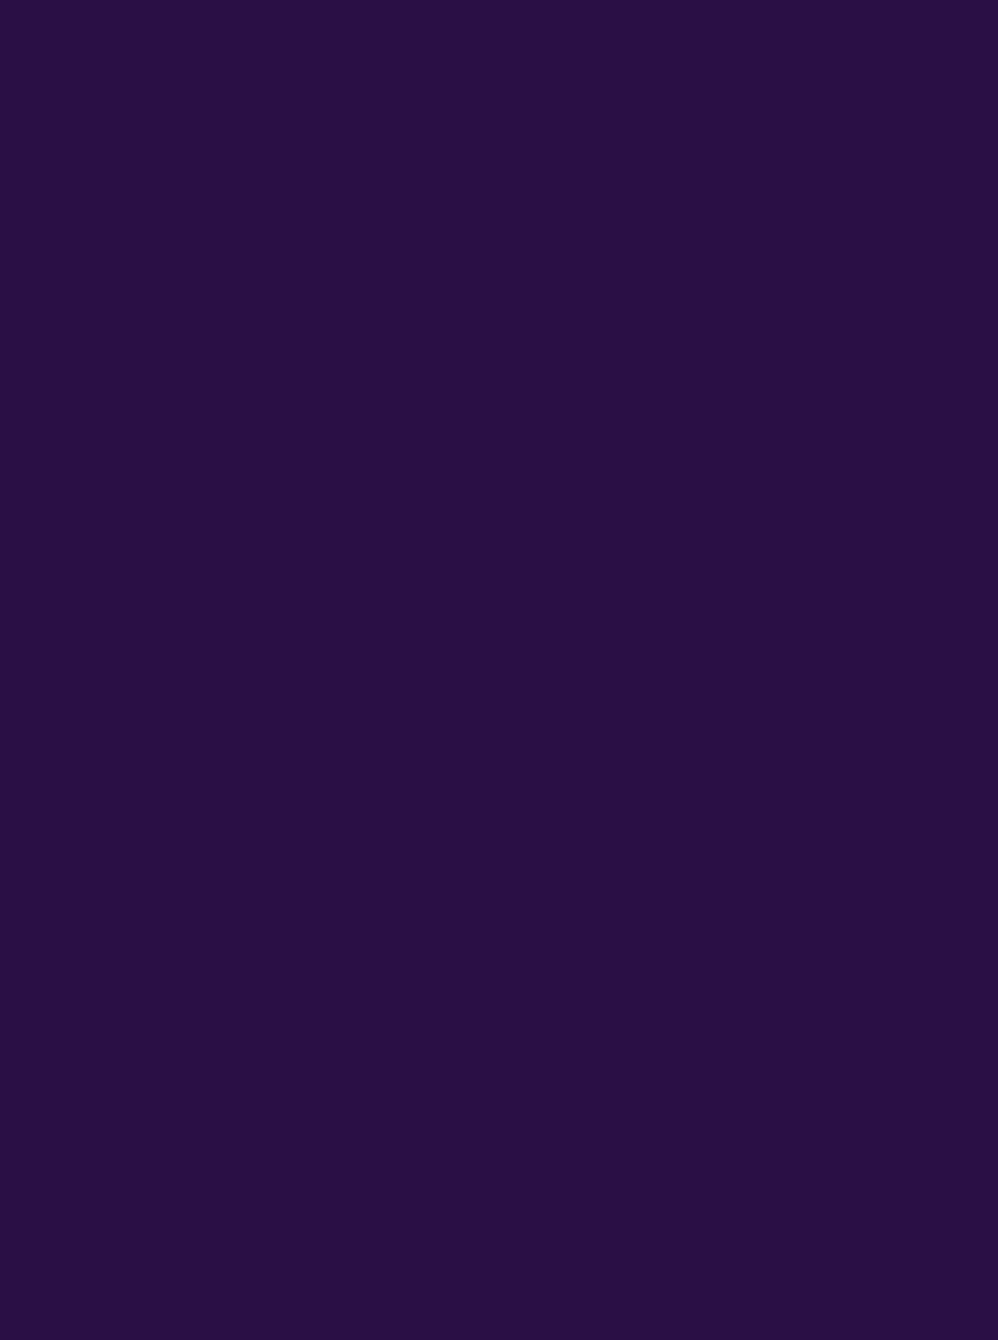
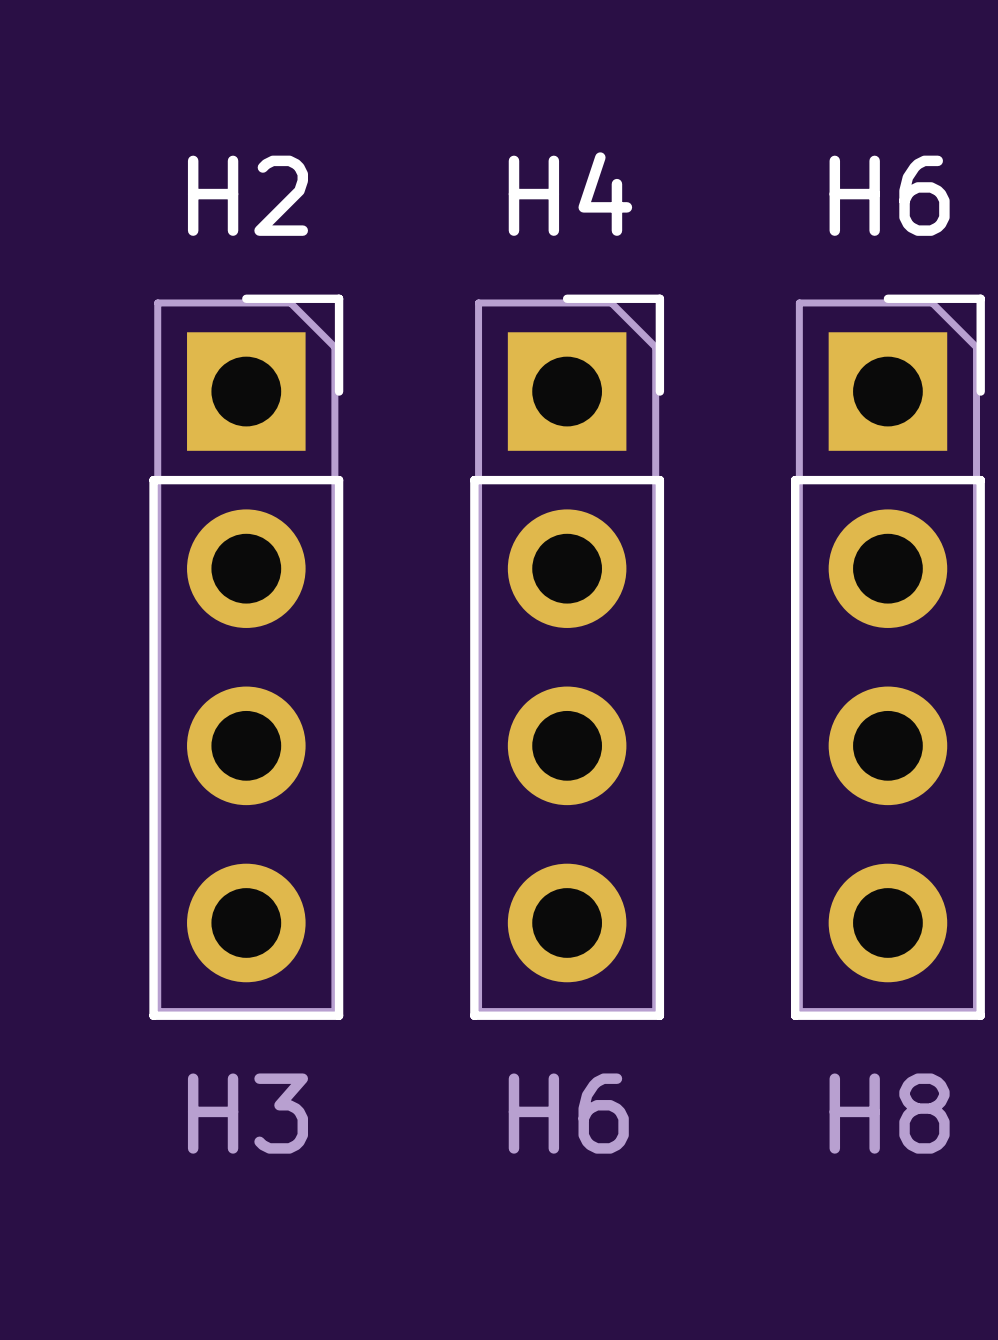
H2: none -> H3 (246, 657)
H4: none -> H6 (567, 657)
H6: none -> H8 (887, 657)

